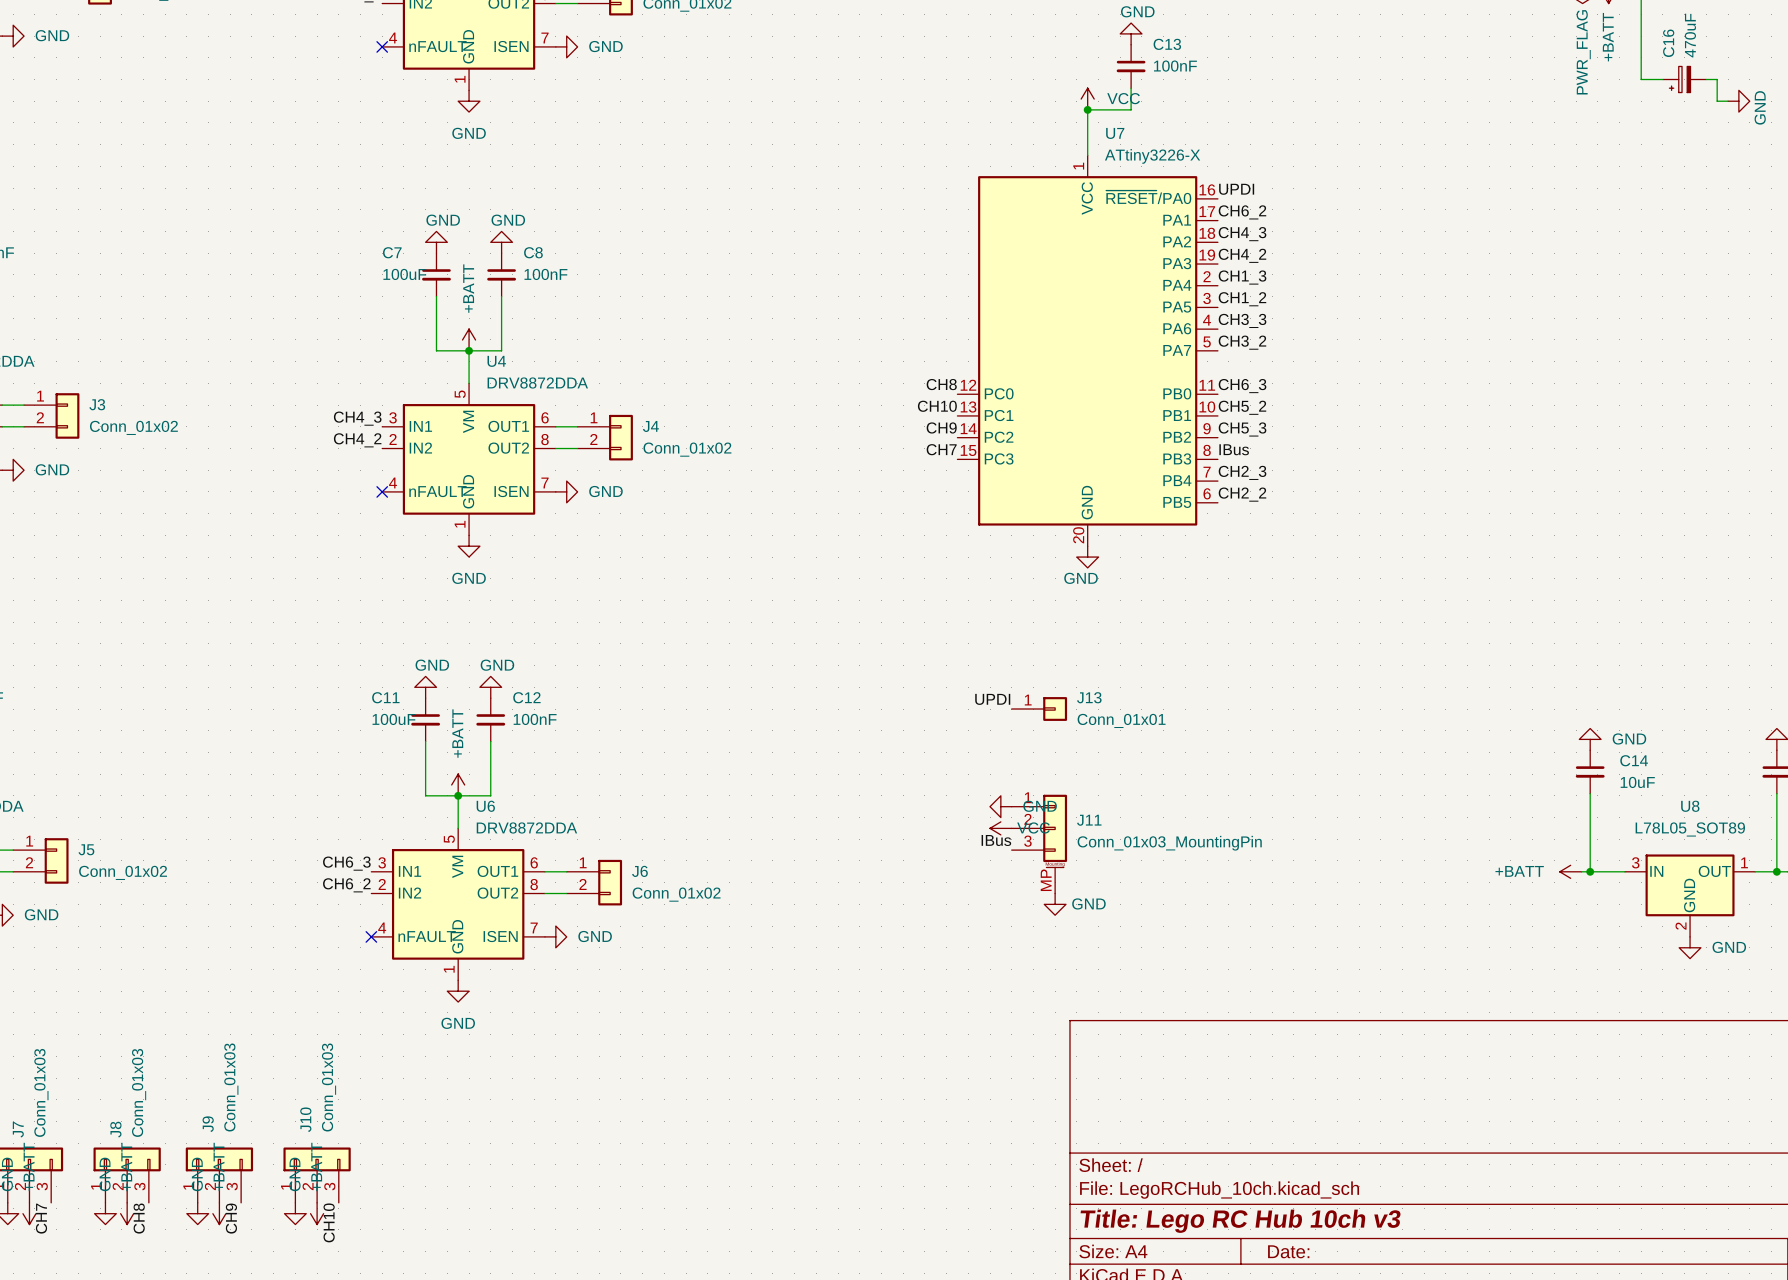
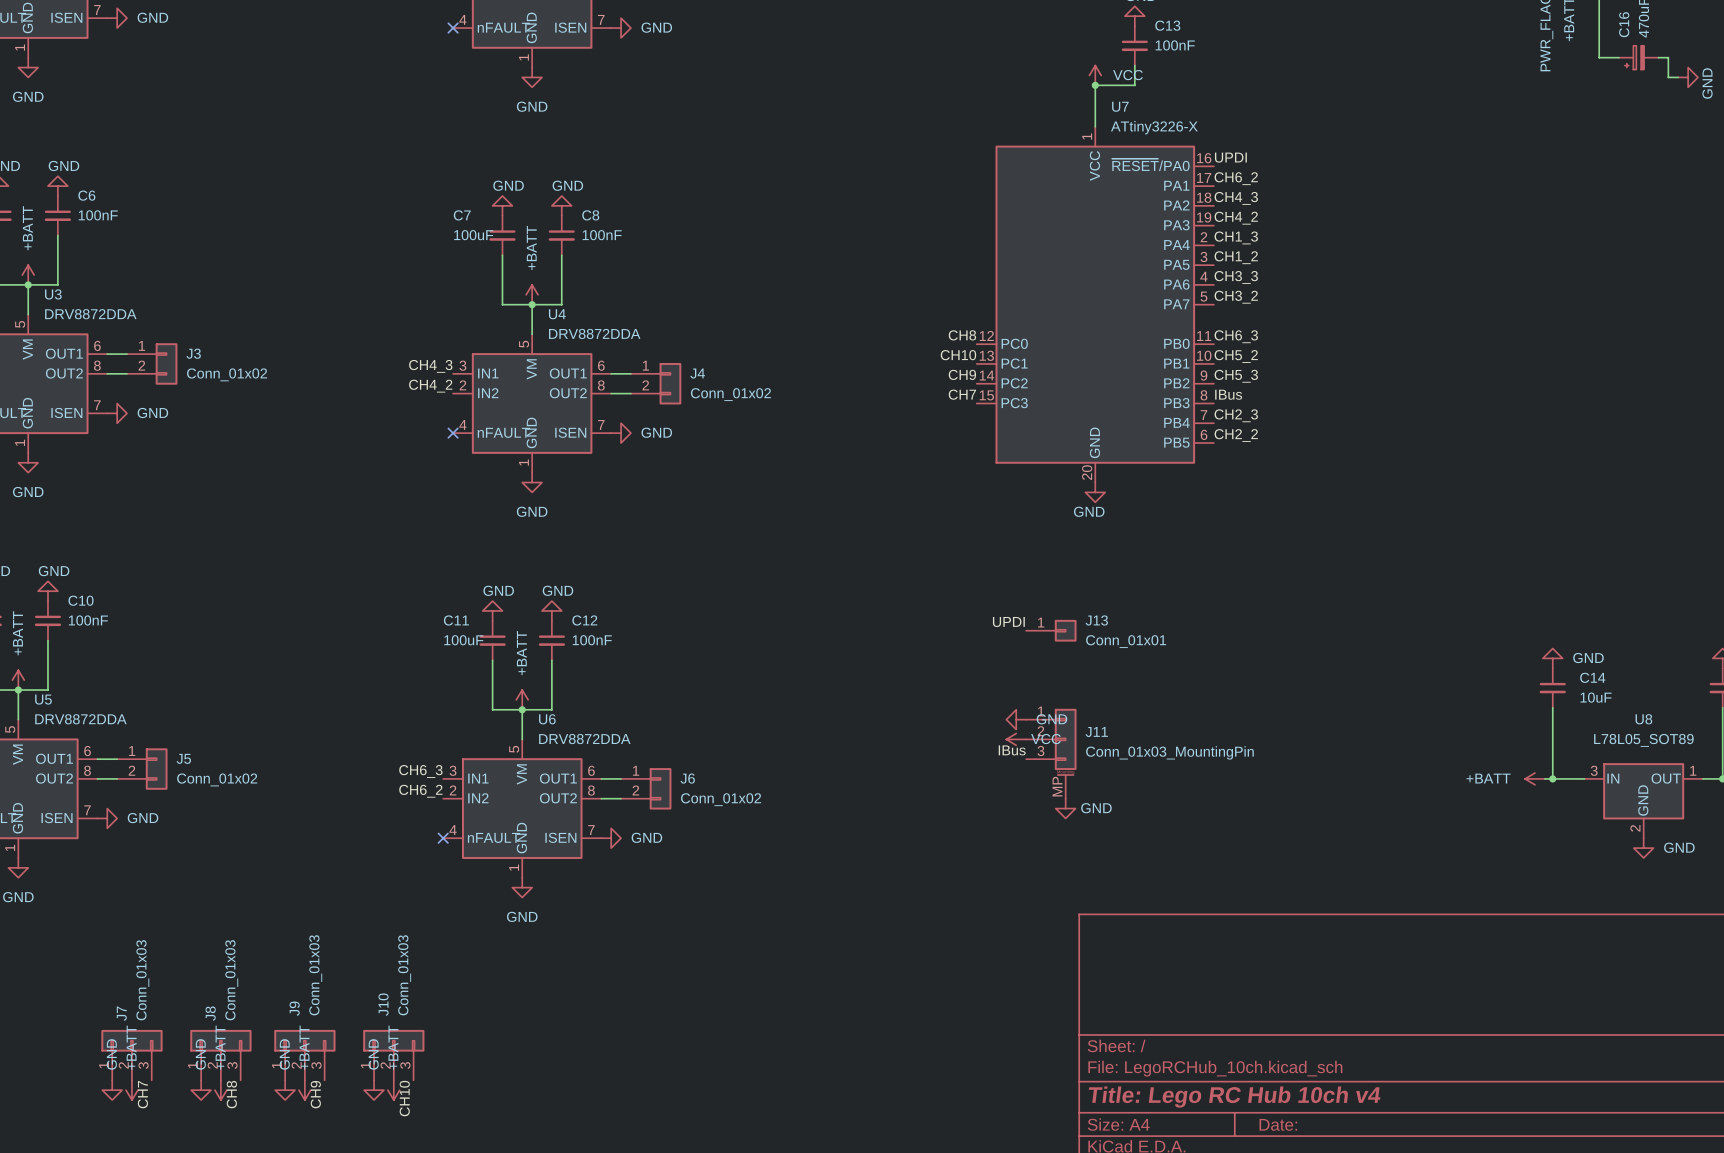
title block: Title: Lego RC Hub 10ch v3 (1240, 1221) -> Title: Lego RC Hub 10ch v4 (1234, 1097)

